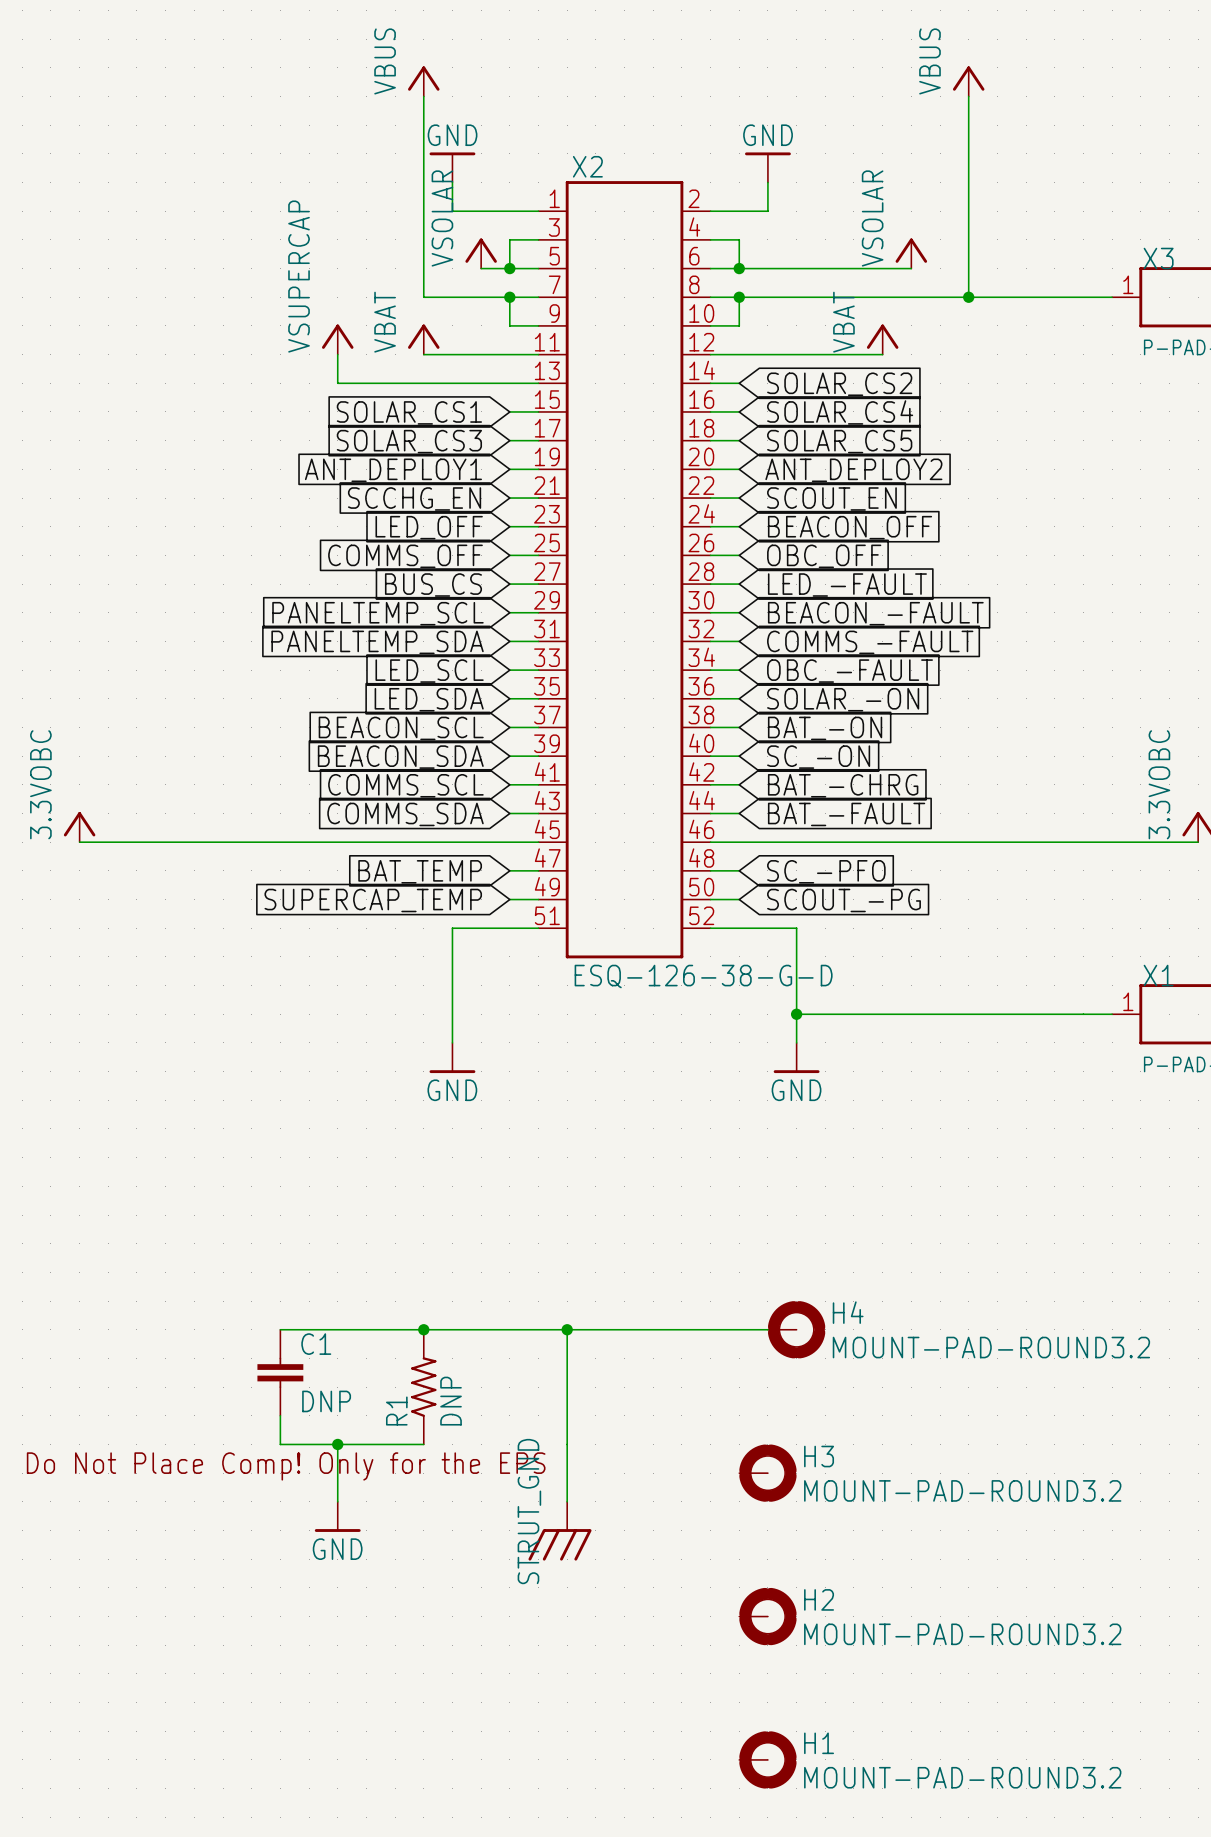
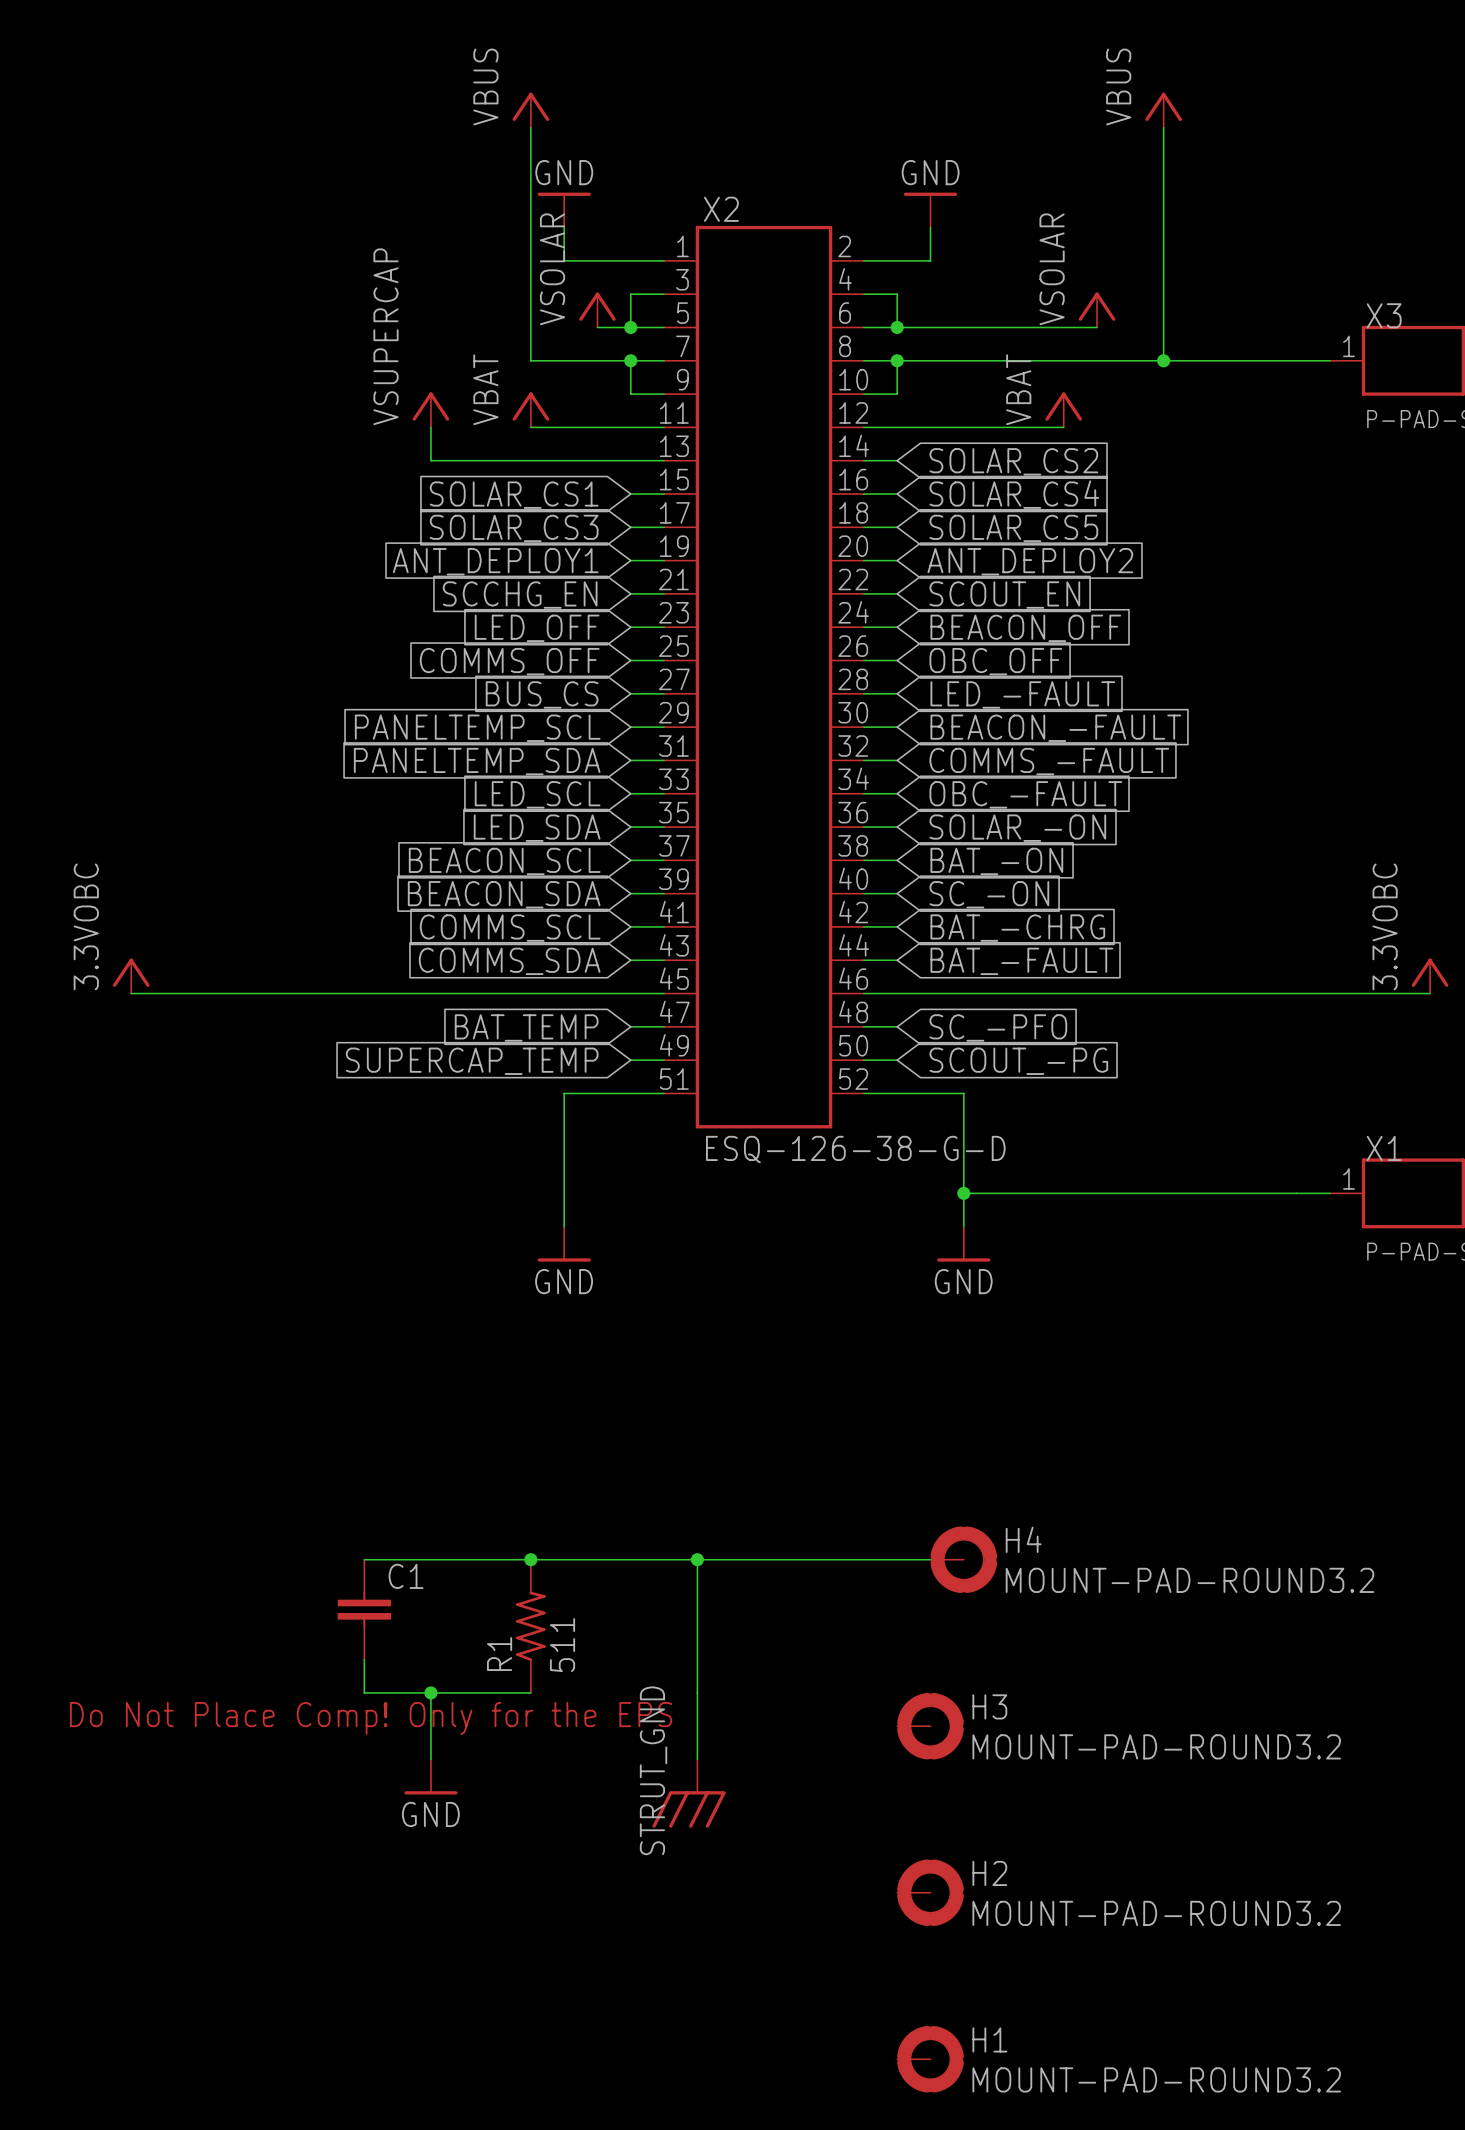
C1 value: DNP (326, 1401) -> none
R1 value: DNP (451, 1401) -> 511 (562, 1645)

